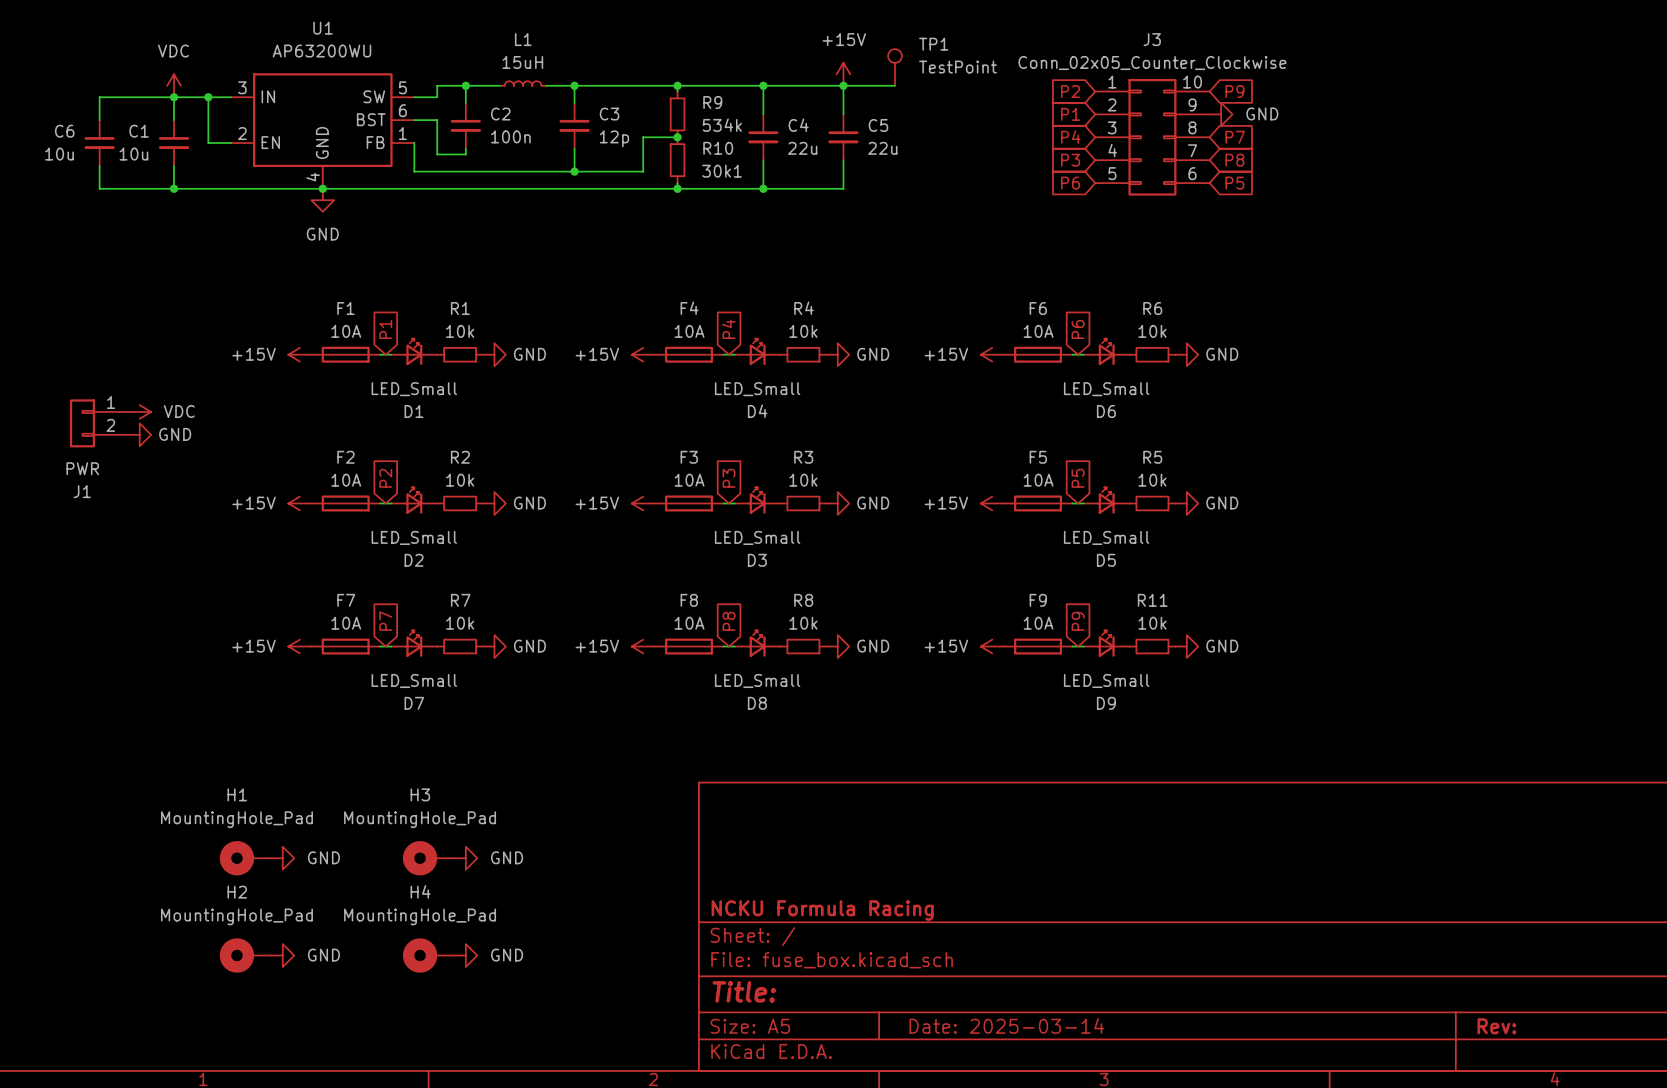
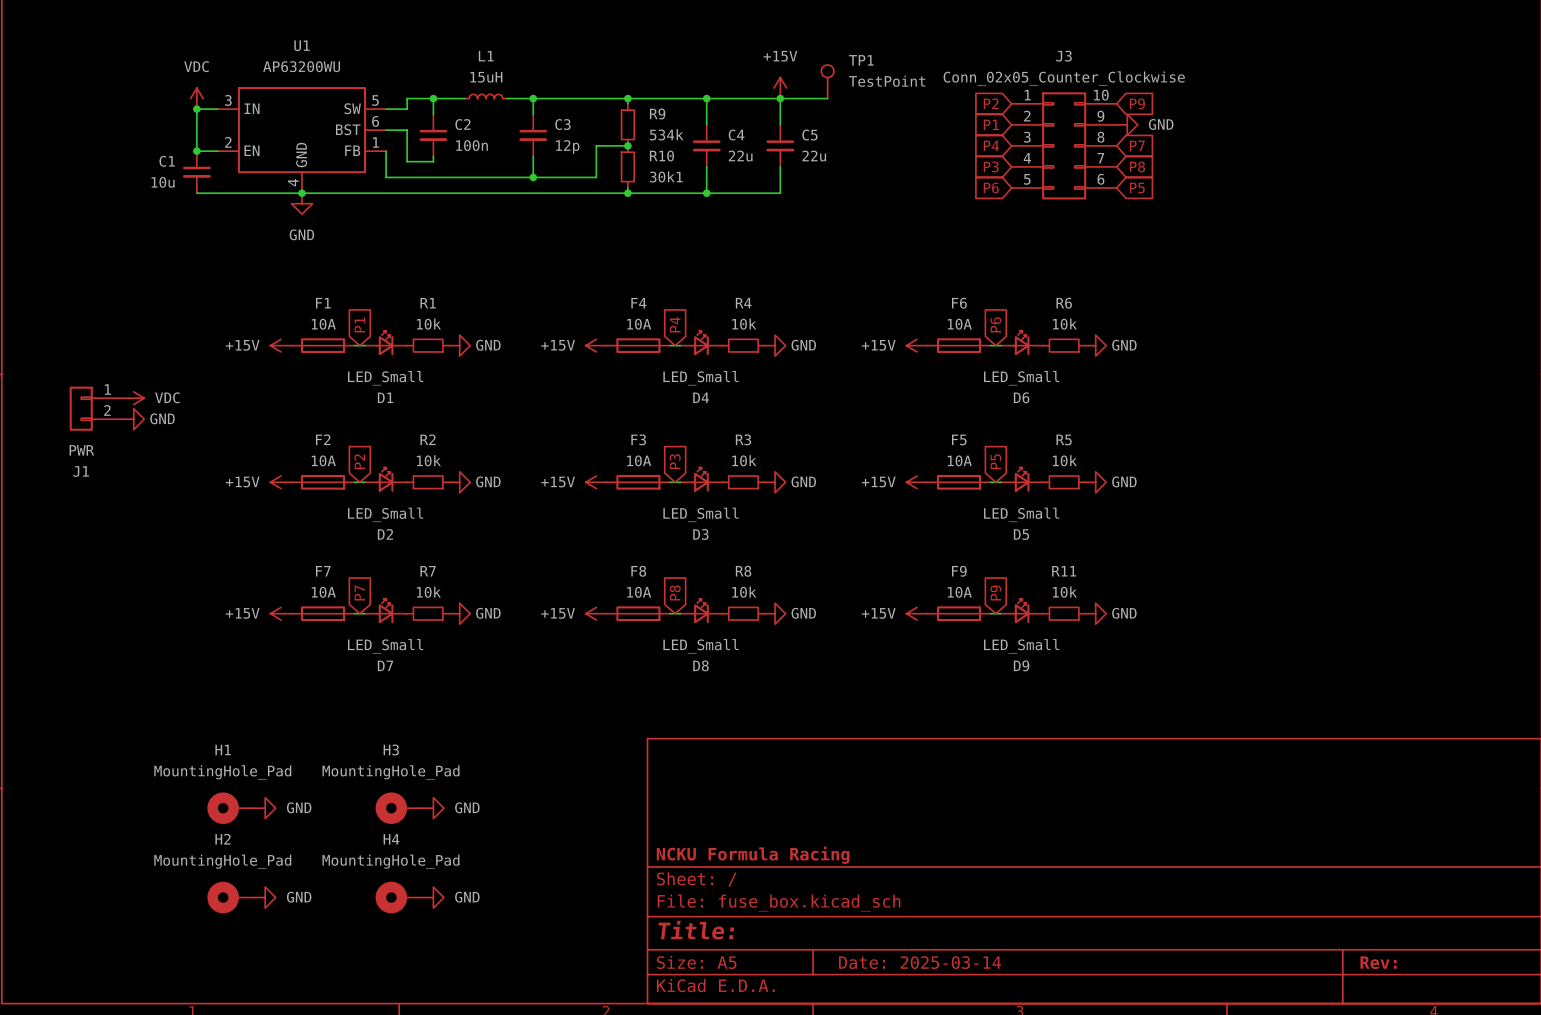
power symbol position: VDC (174, 85) -> VDC (196, 98)
wire: (174, 97) (174, 120) -> none
junction: (174, 97) -> none
wire: (208, 97) (99, 97) (99, 120) -> none
C6: 10u (99, 143) -> none
C1 position: (174, 143) -> (196, 172)
junction: none -> (196, 151)
wire: (99, 165) (99, 188) (208, 188) -> none
wire: (174, 165) (174, 188) -> none
junction: (174, 188) -> none

